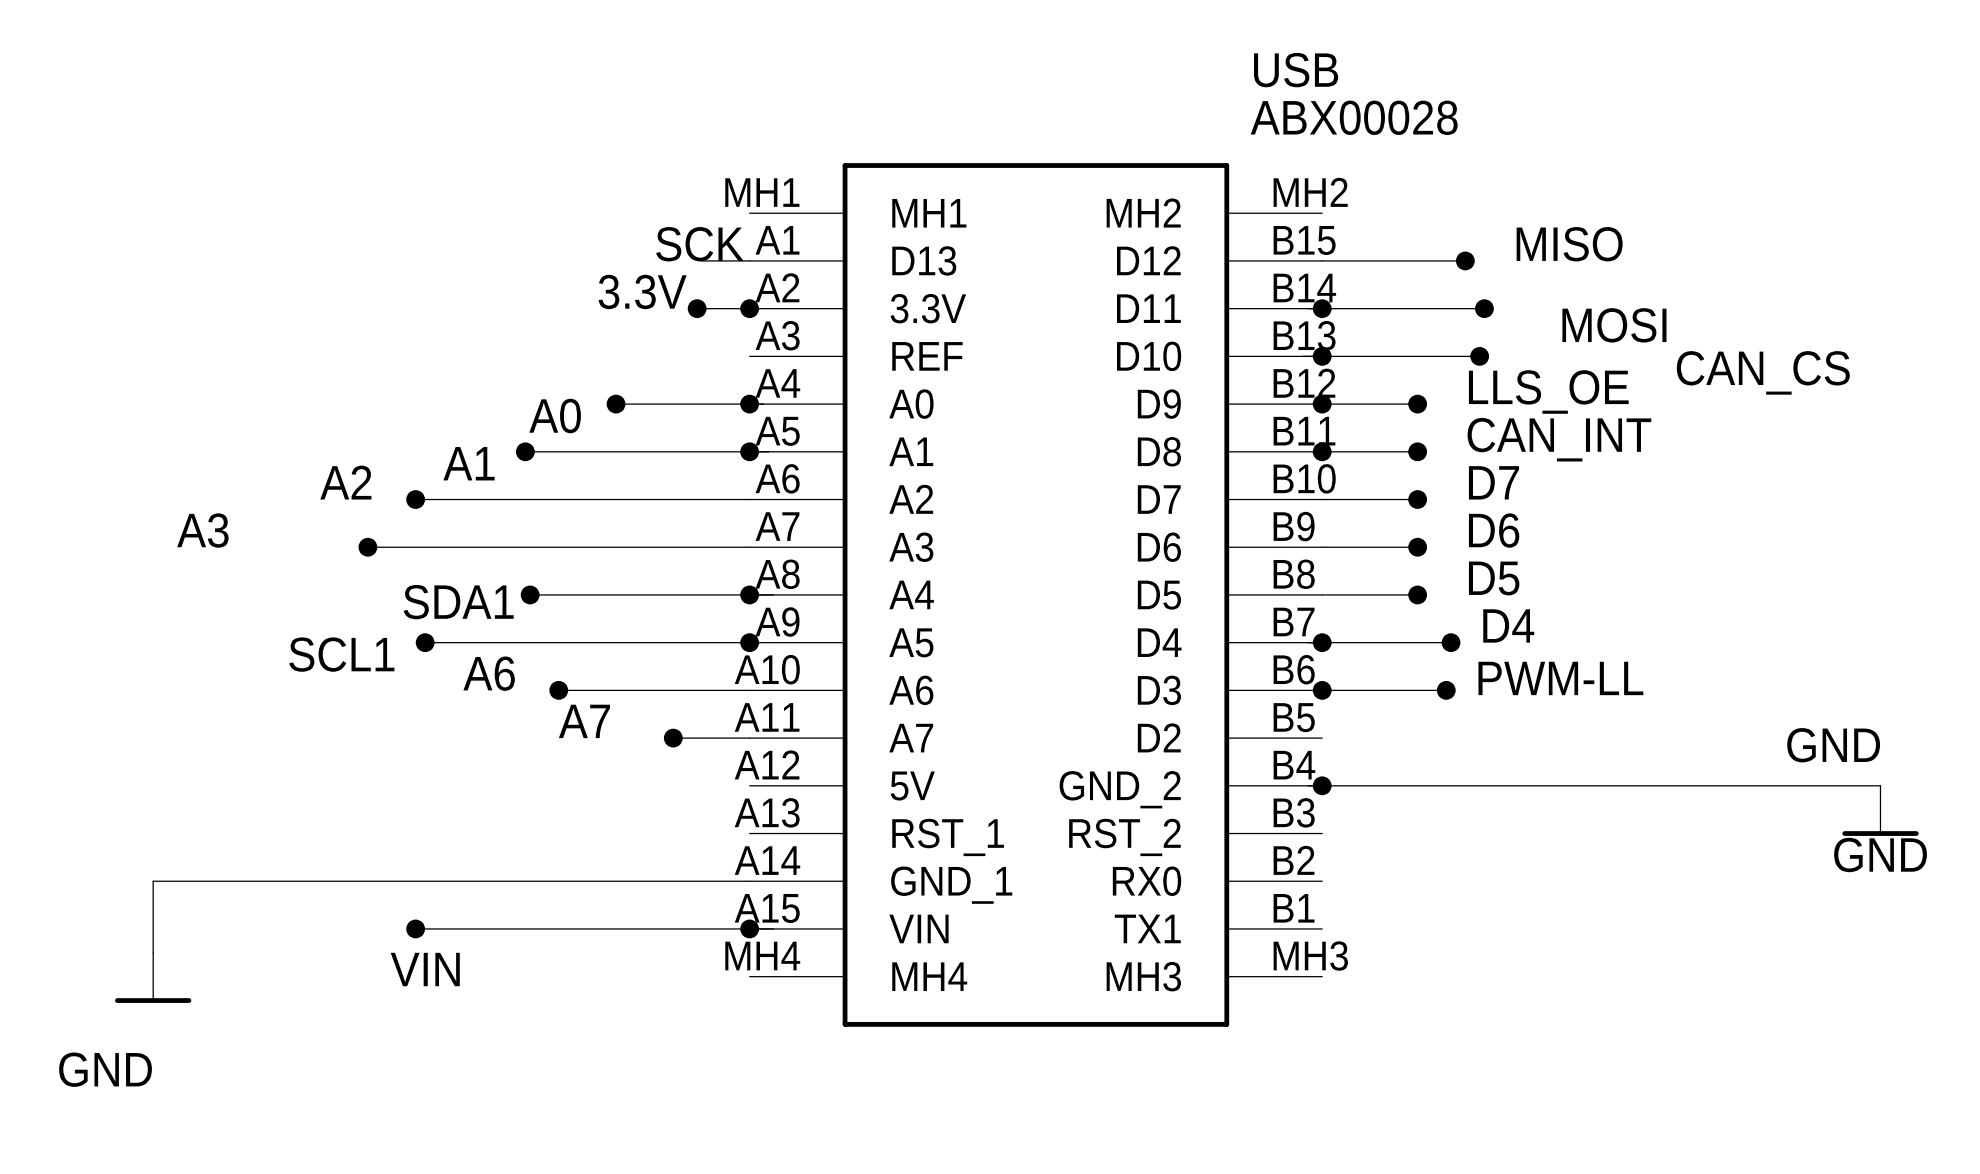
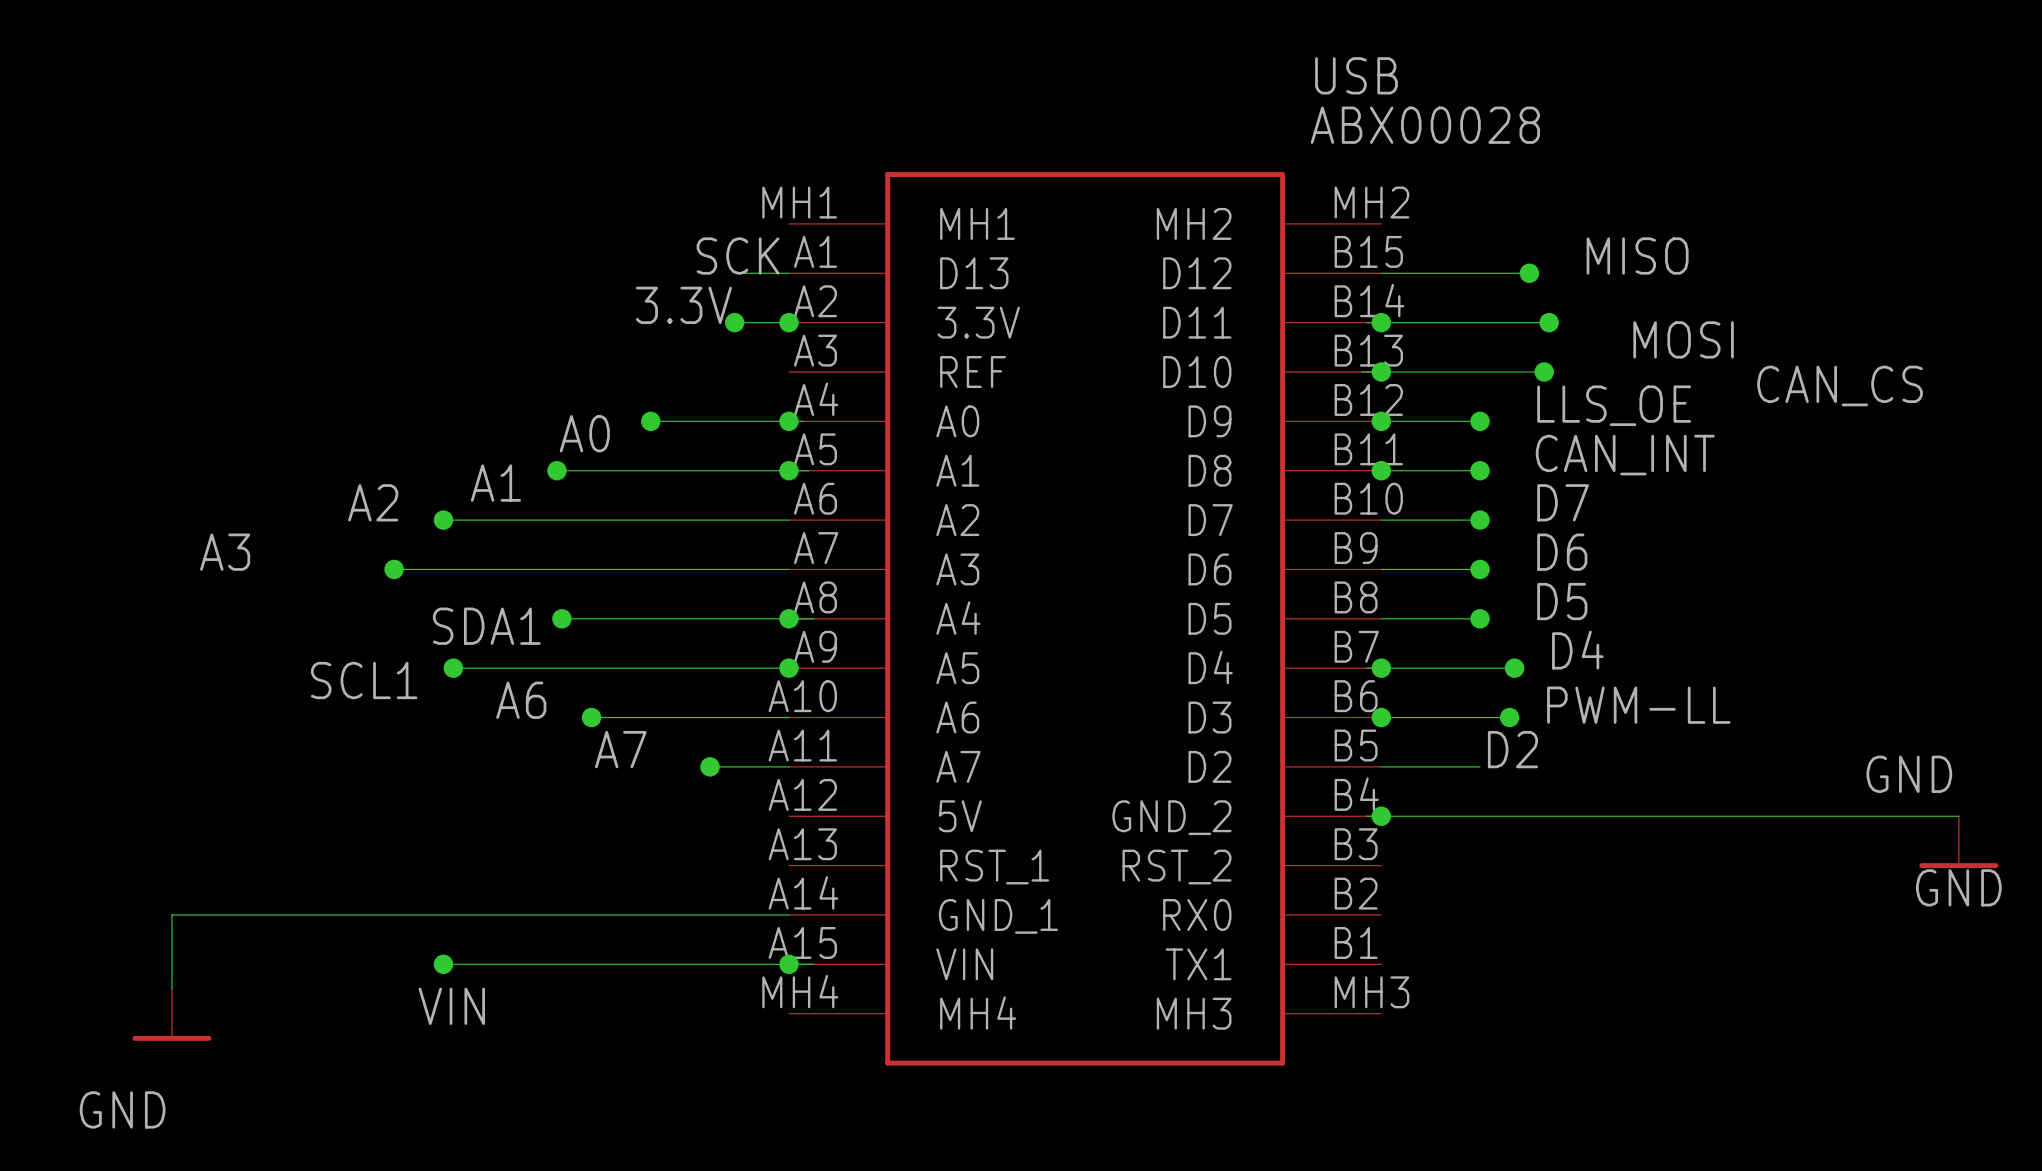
label: none -> D2 (1512, 749)
wire: none -> (1381, 766) (1480, 766)

